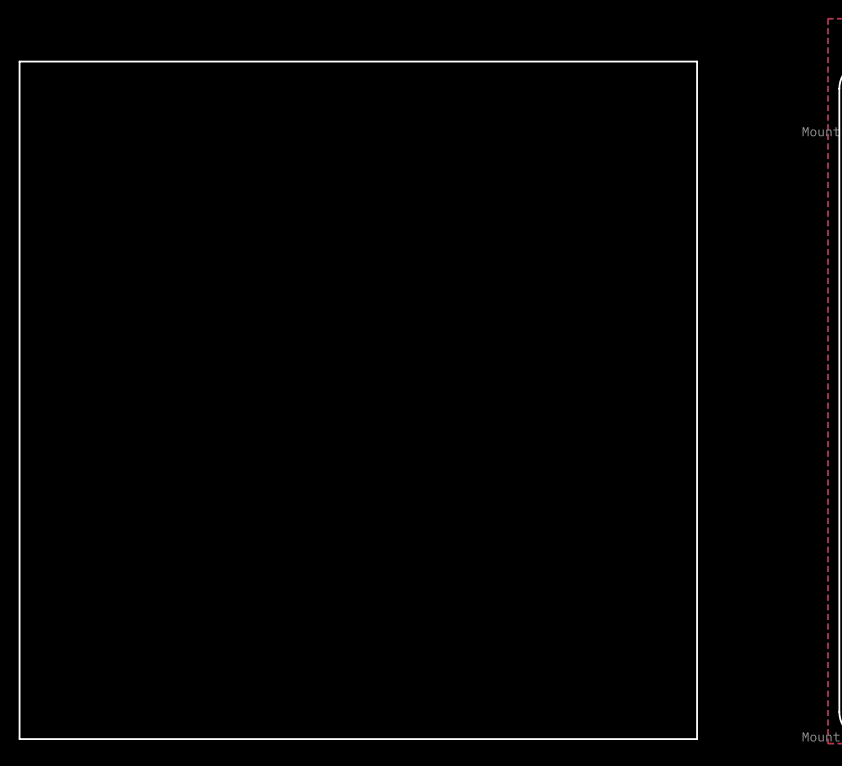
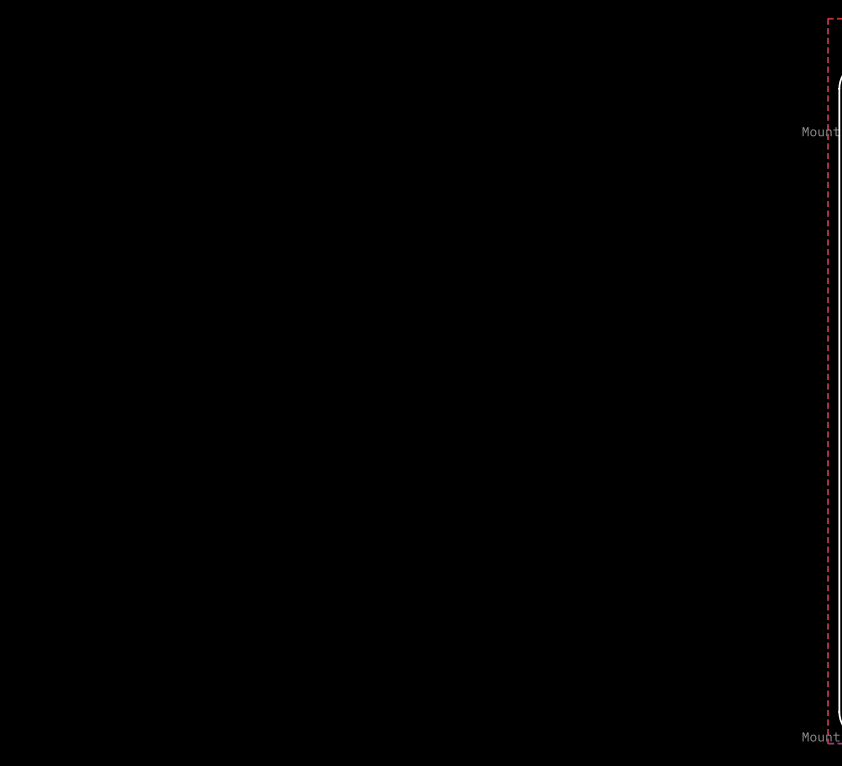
board edge: (19, 61) (697, 61) (697, 739) (19, 739) (19, 61) -> none

